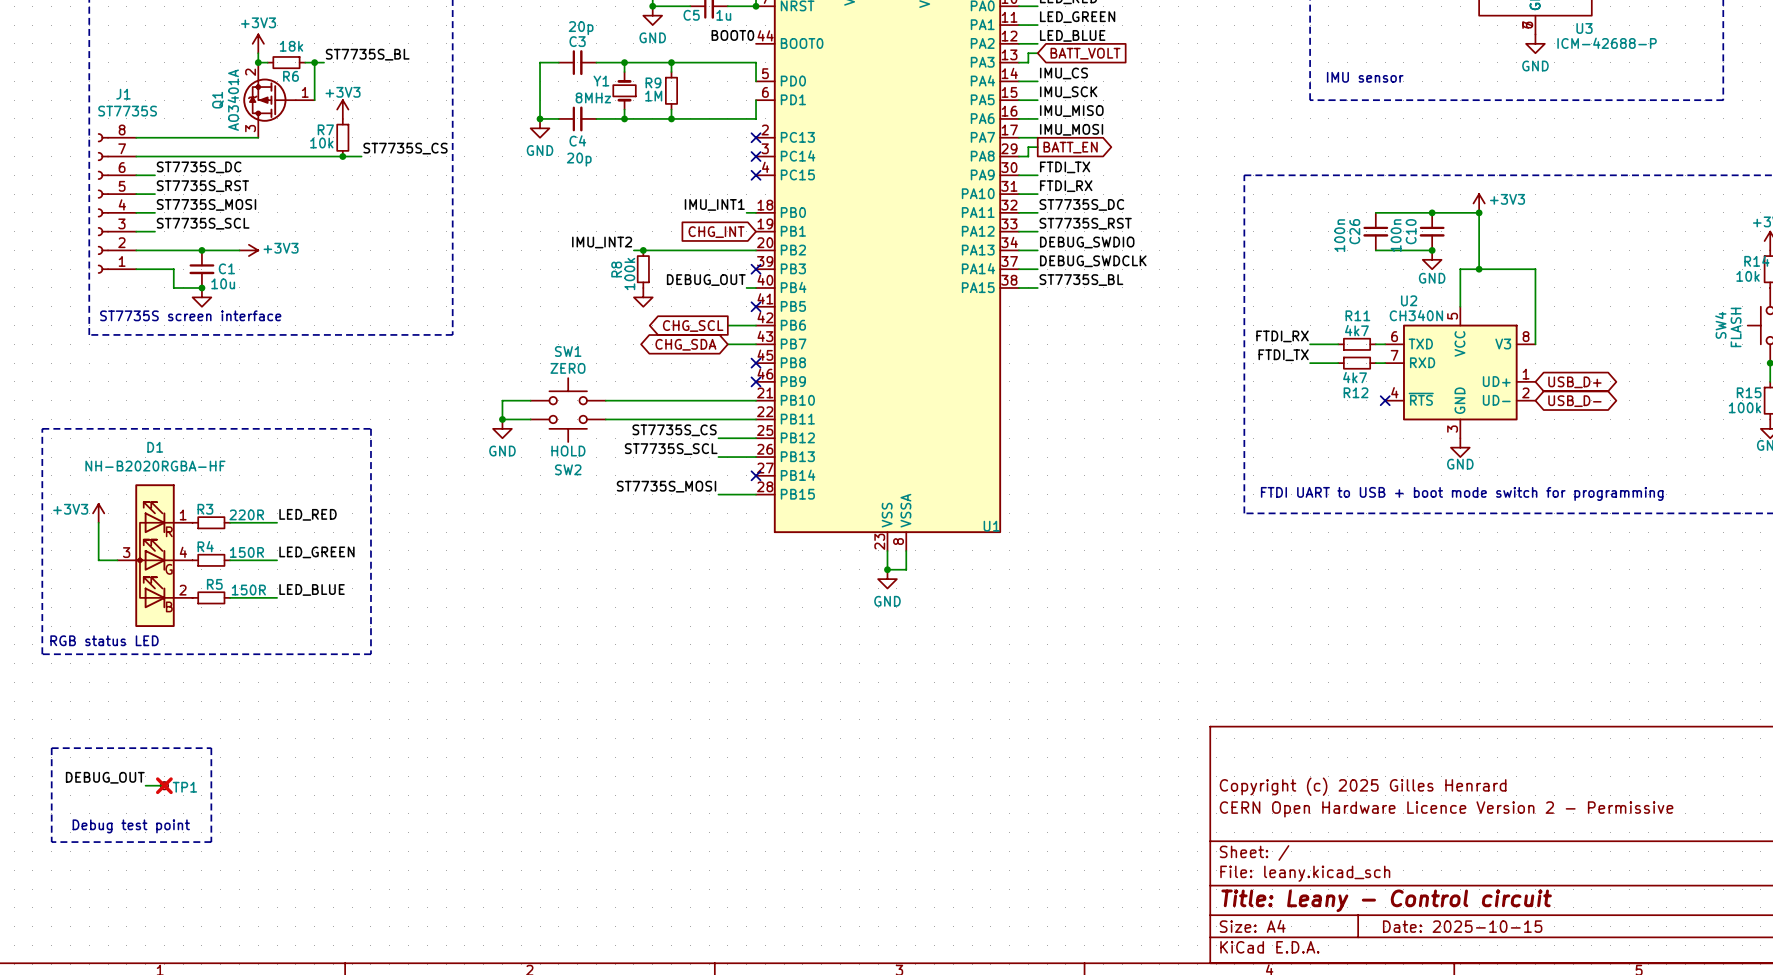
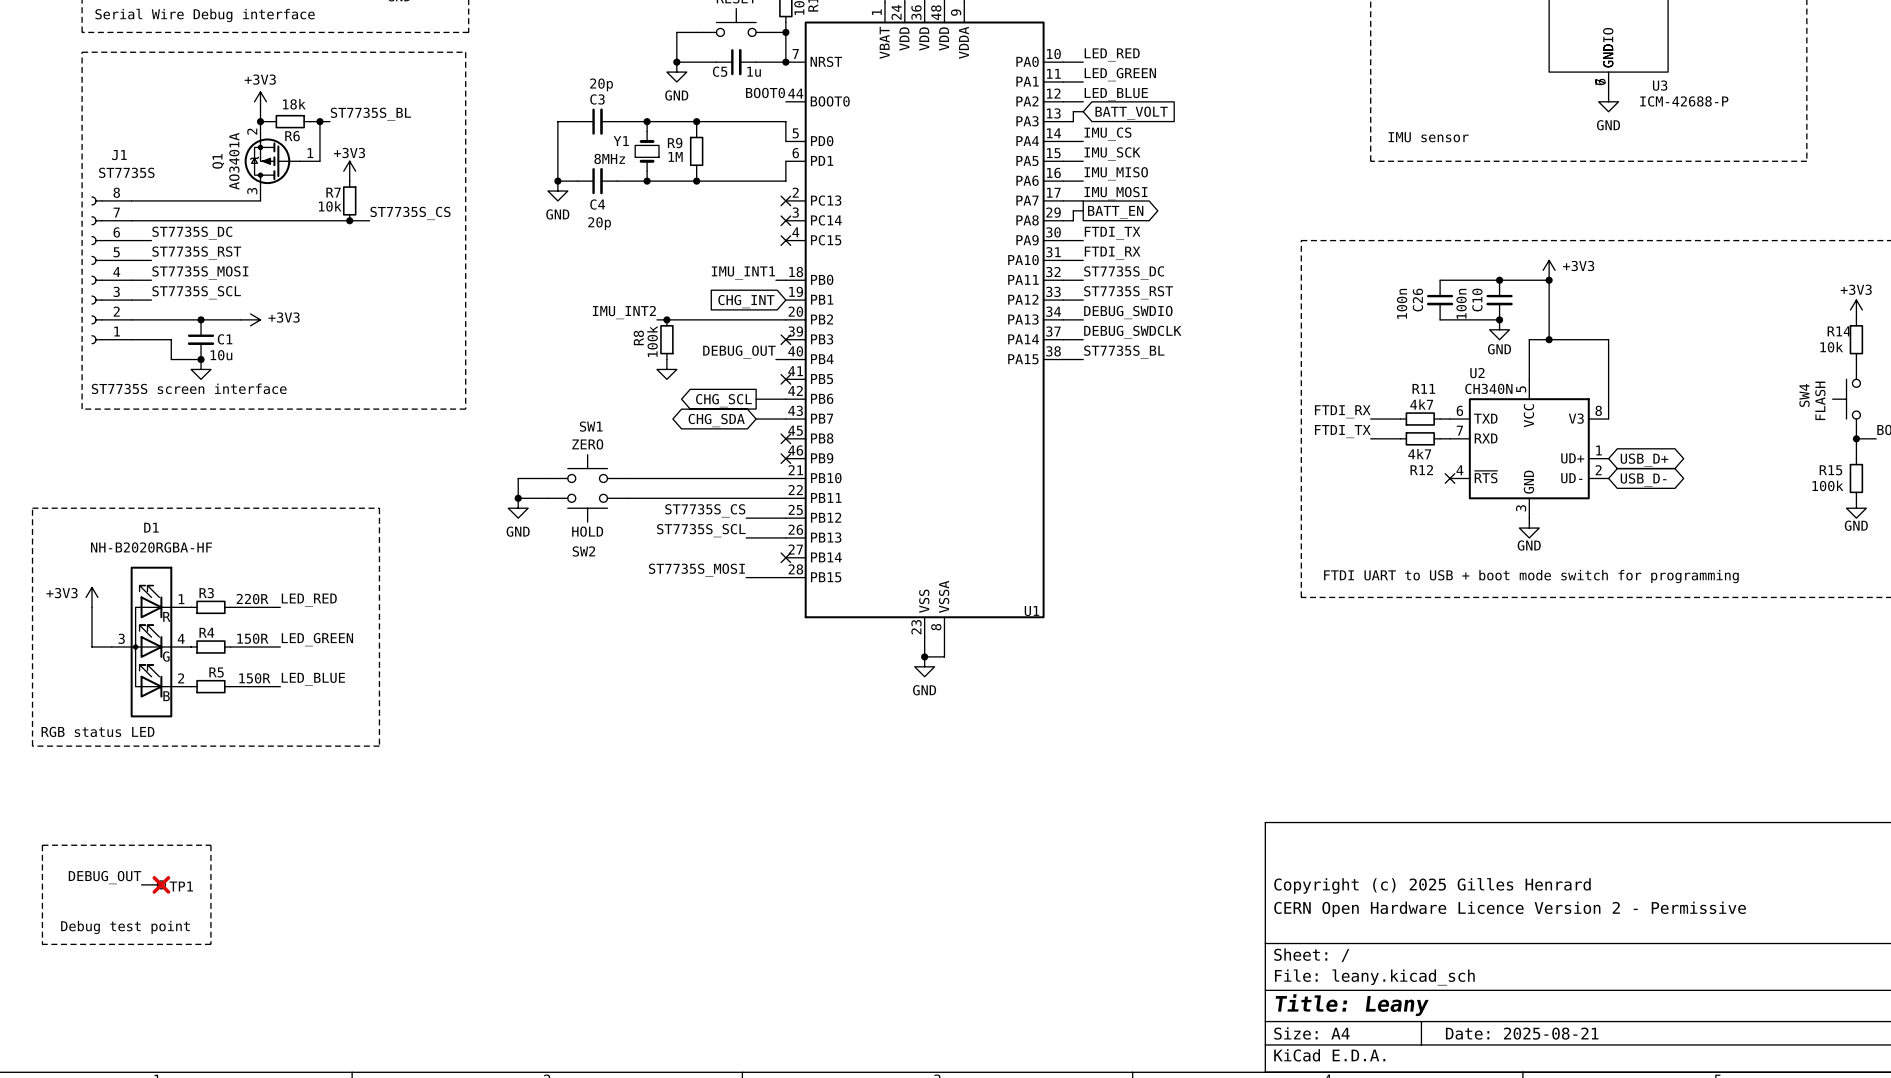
title block: Title: Leany - Control circuit (1386, 900) -> Title: Leany (1352, 1005)
title block: Date: 2025-10-15 (1462, 926) -> Date: 2025-08-21 (1522, 1033)

